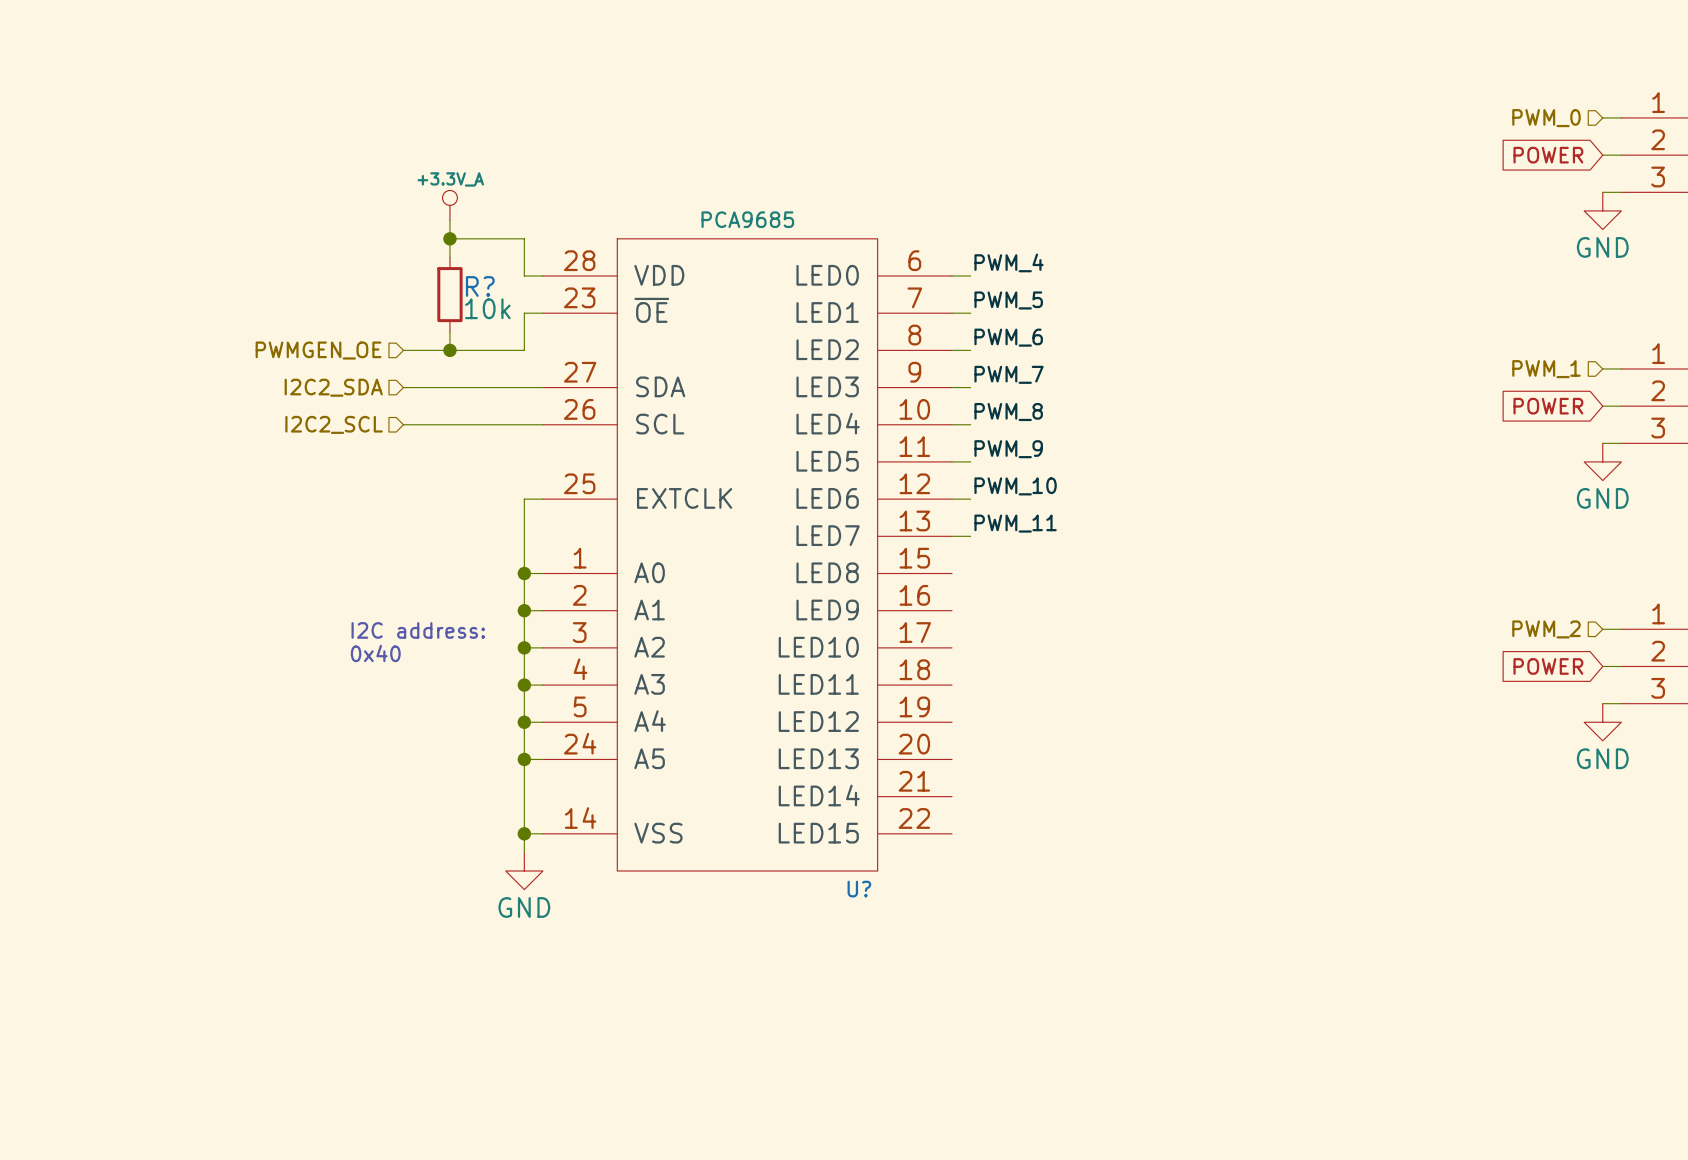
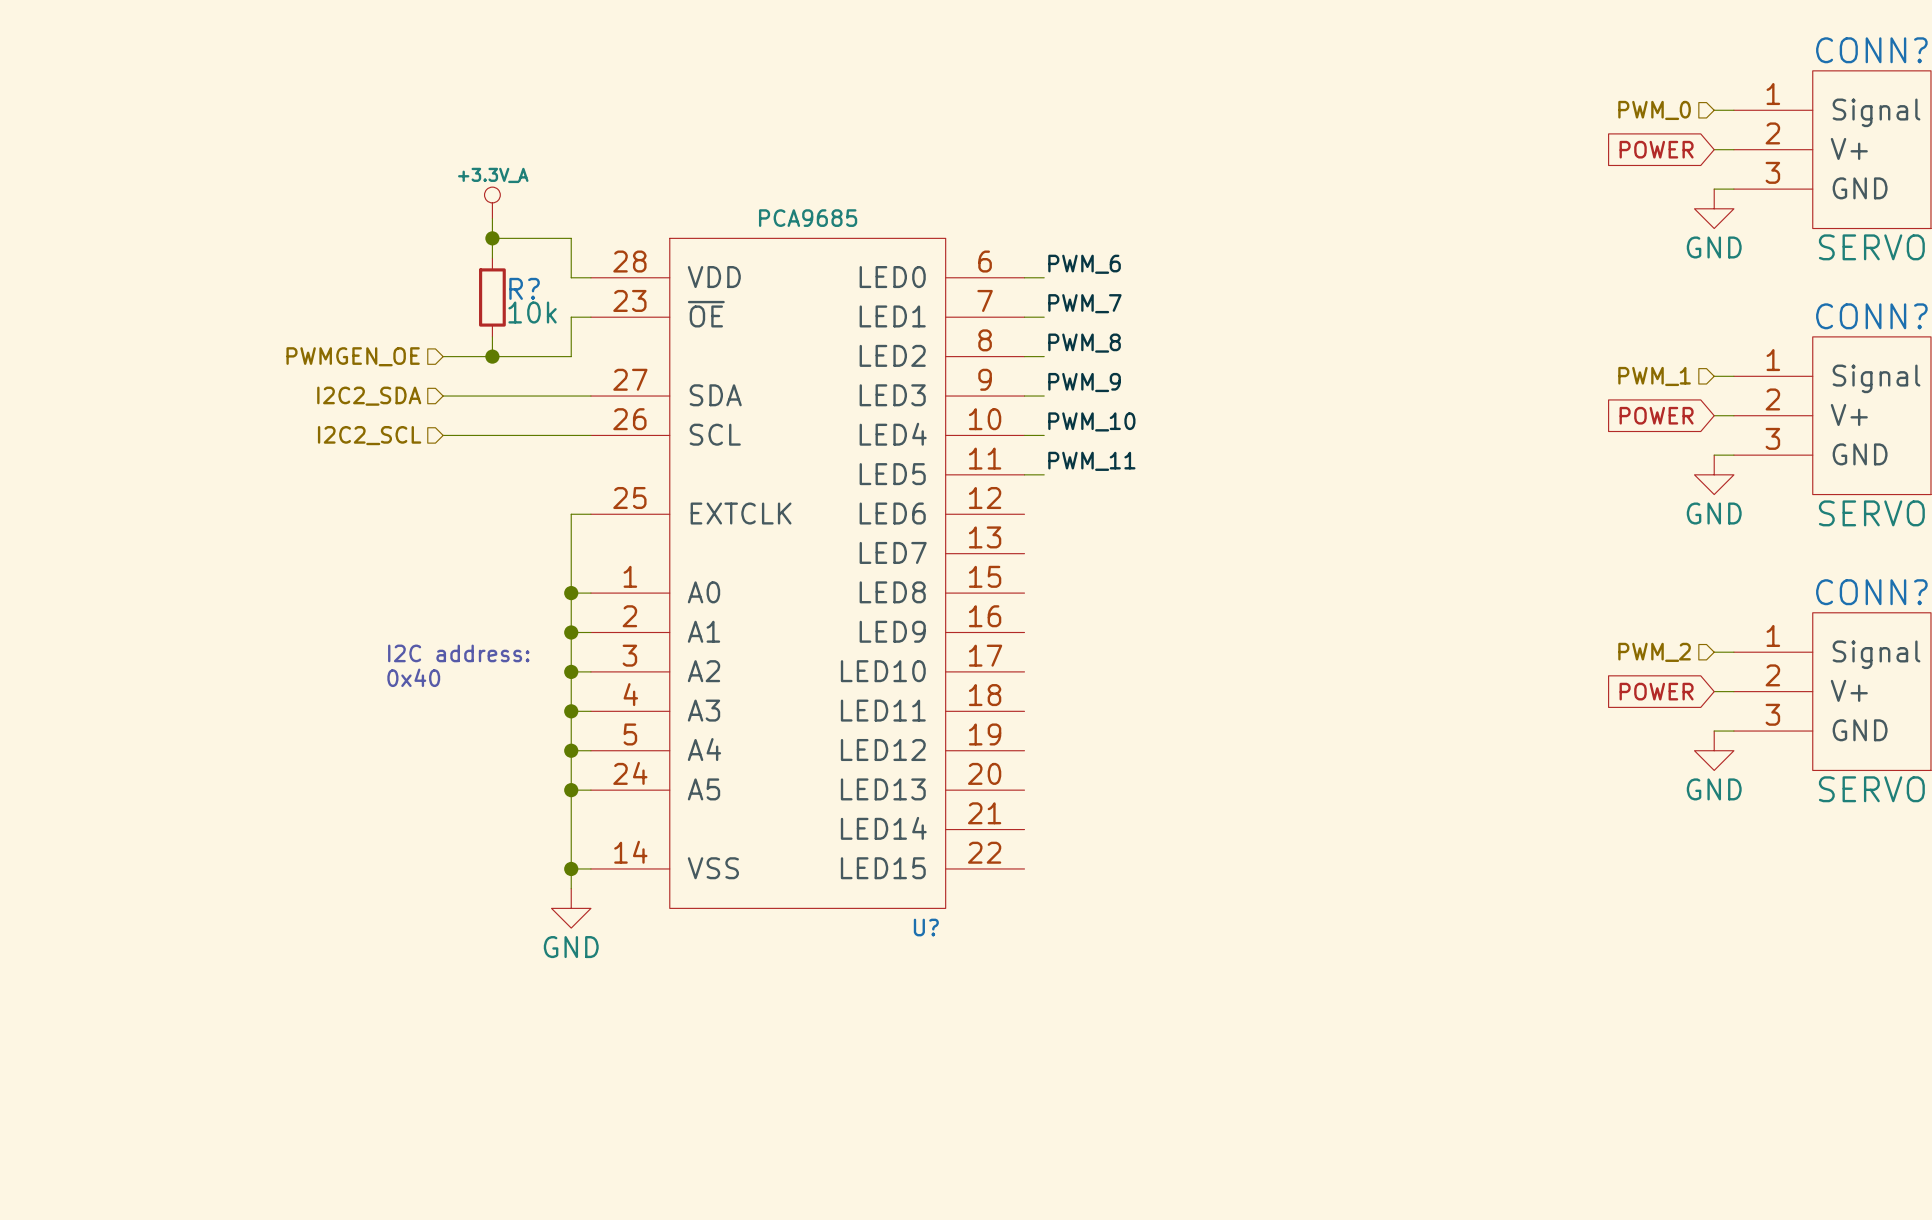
label: PWM_4 (1009, 262) -> PWM_6 (1084, 264)
label: PWM_5 (1008, 300) -> PWM_7 (1084, 303)
label: PWM_6 (1008, 337) -> PWM_8 (1084, 343)
label: PWM_7 (1009, 374) -> PWM_9 (1084, 382)
label: PWM_8 (1008, 412) -> PWM_10 (1091, 421)
label: PWM_9 (1008, 449) -> PWM_11 (1091, 461)
label: PWM_10 (1015, 486) -> none
wire: (952, 499) (970, 499) -> none
label: PWM_11 (1015, 523) -> none
wire: (952, 536) (970, 536) -> none

